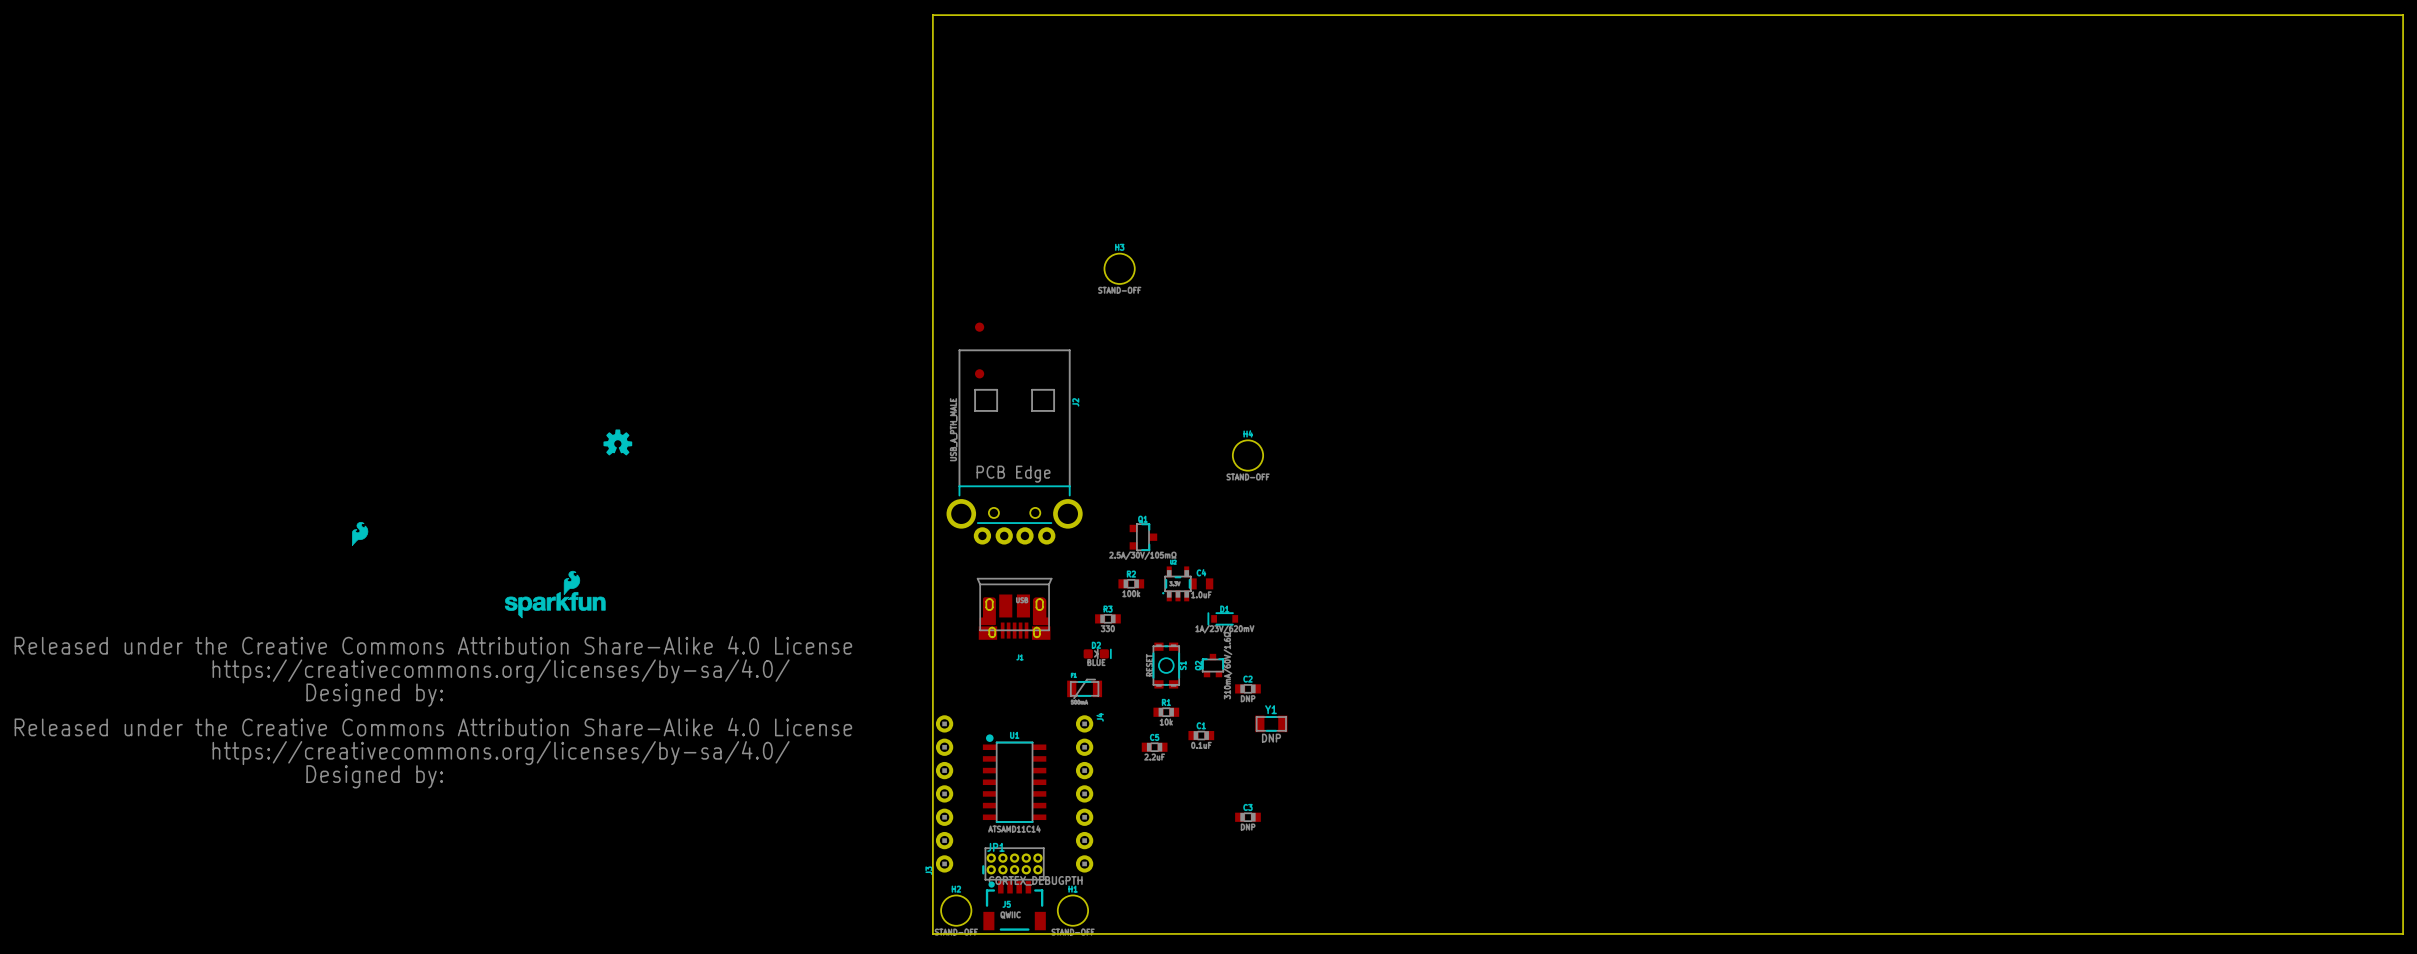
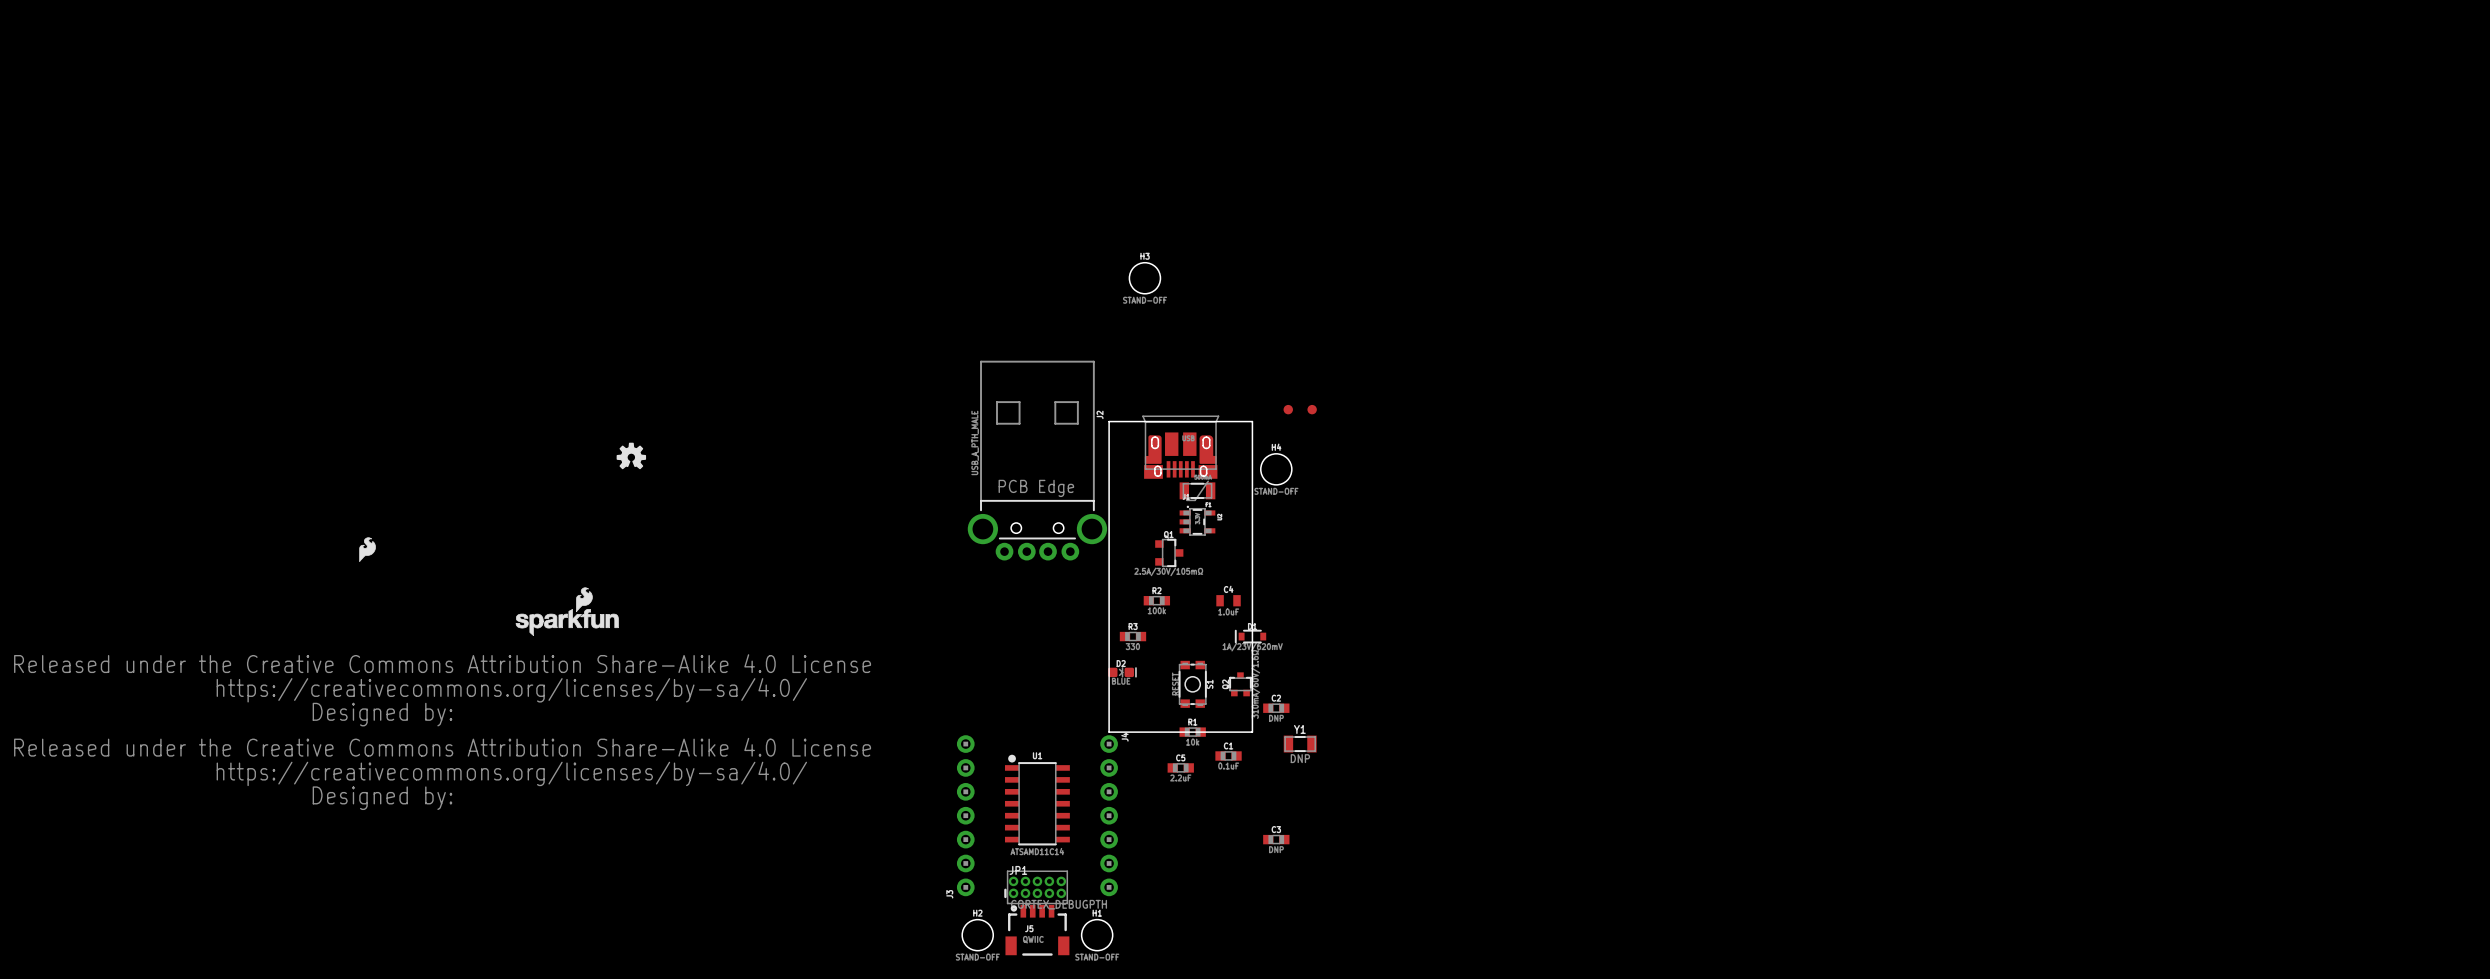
board edge: (932, 15) (2403, 15) (2403, 933) (932, 933) (932, 15) -> none
part: (979, 327) -> none
part: (979, 373) -> none
part: none -> (1288, 409)
part: none -> (1312, 409)
board edge: none -> (1109, 421) (1252, 421) (1252, 732) (1109, 732) (1109, 421)
part rotation: 0° (1176, 583) -> 90° clockwise (1197, 520)
part position: (1176, 583) -> (1197, 520)
part position: (1014, 608) -> (1180, 447)
part rotation: 0° (1084, 688) -> 180° (1197, 490)
part position: (1084, 688) -> (1197, 490)

